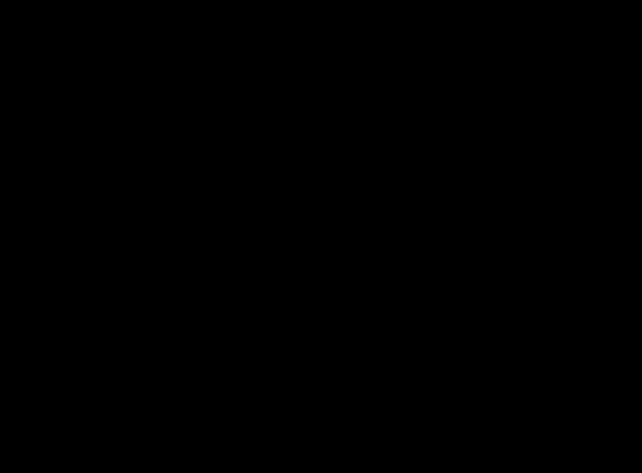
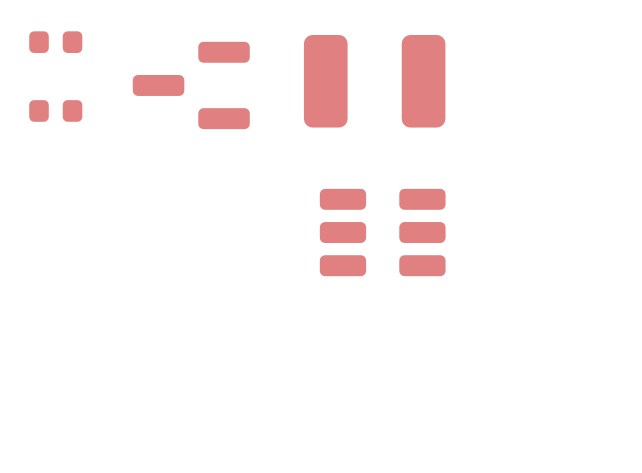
part: none -> (55, 42)
part: none -> (374, 81)
part: none -> (191, 85)
part: none -> (55, 110)
part: none -> (382, 232)

